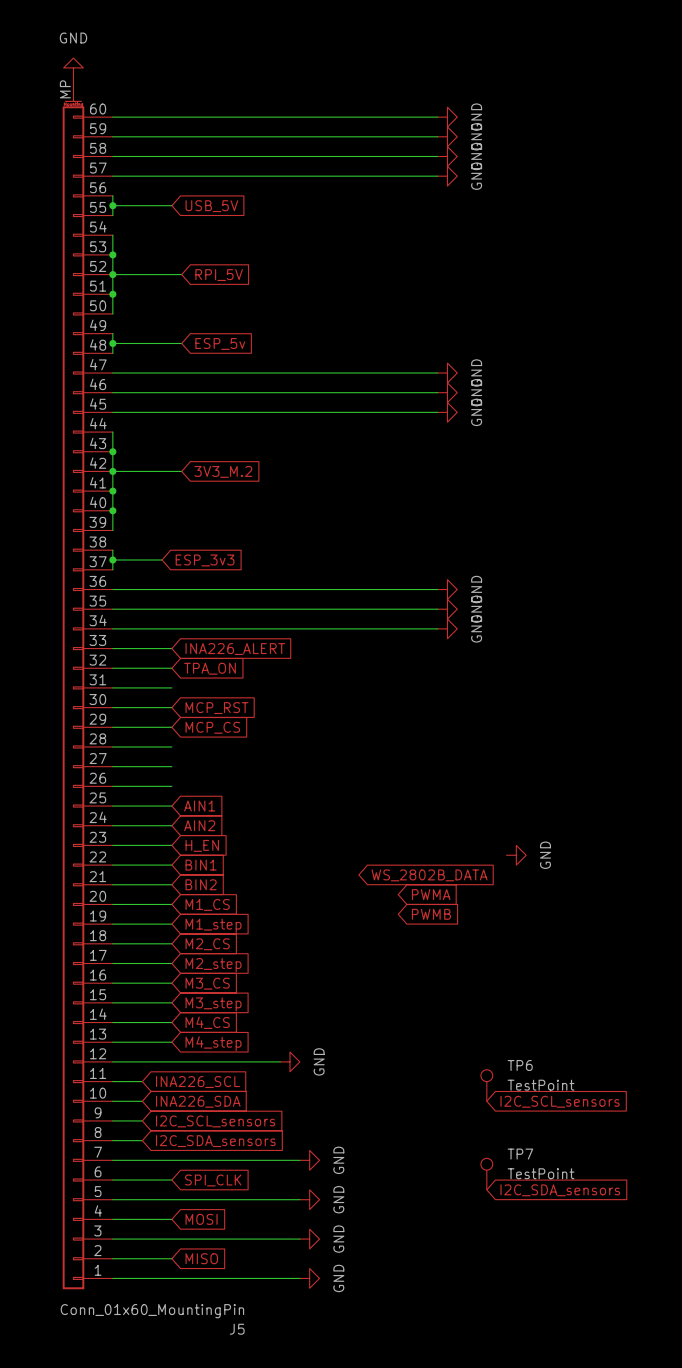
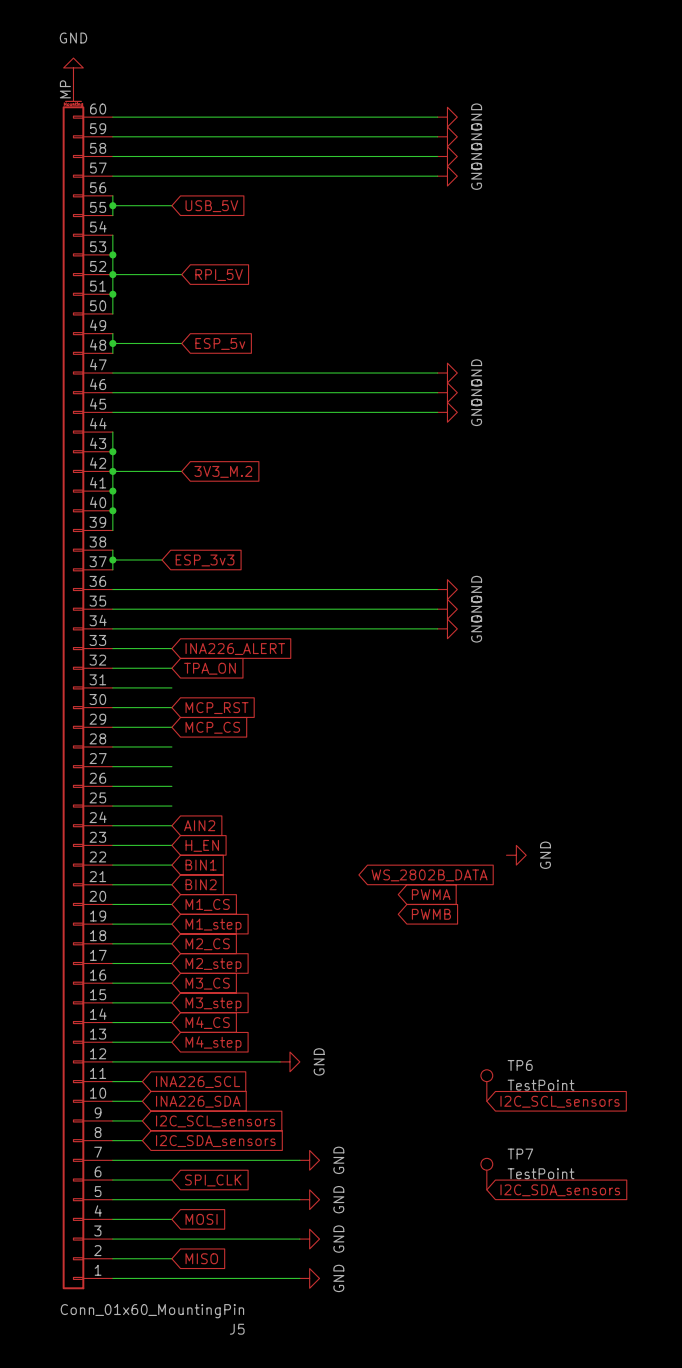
global label: AIN1 (199, 806) -> none

